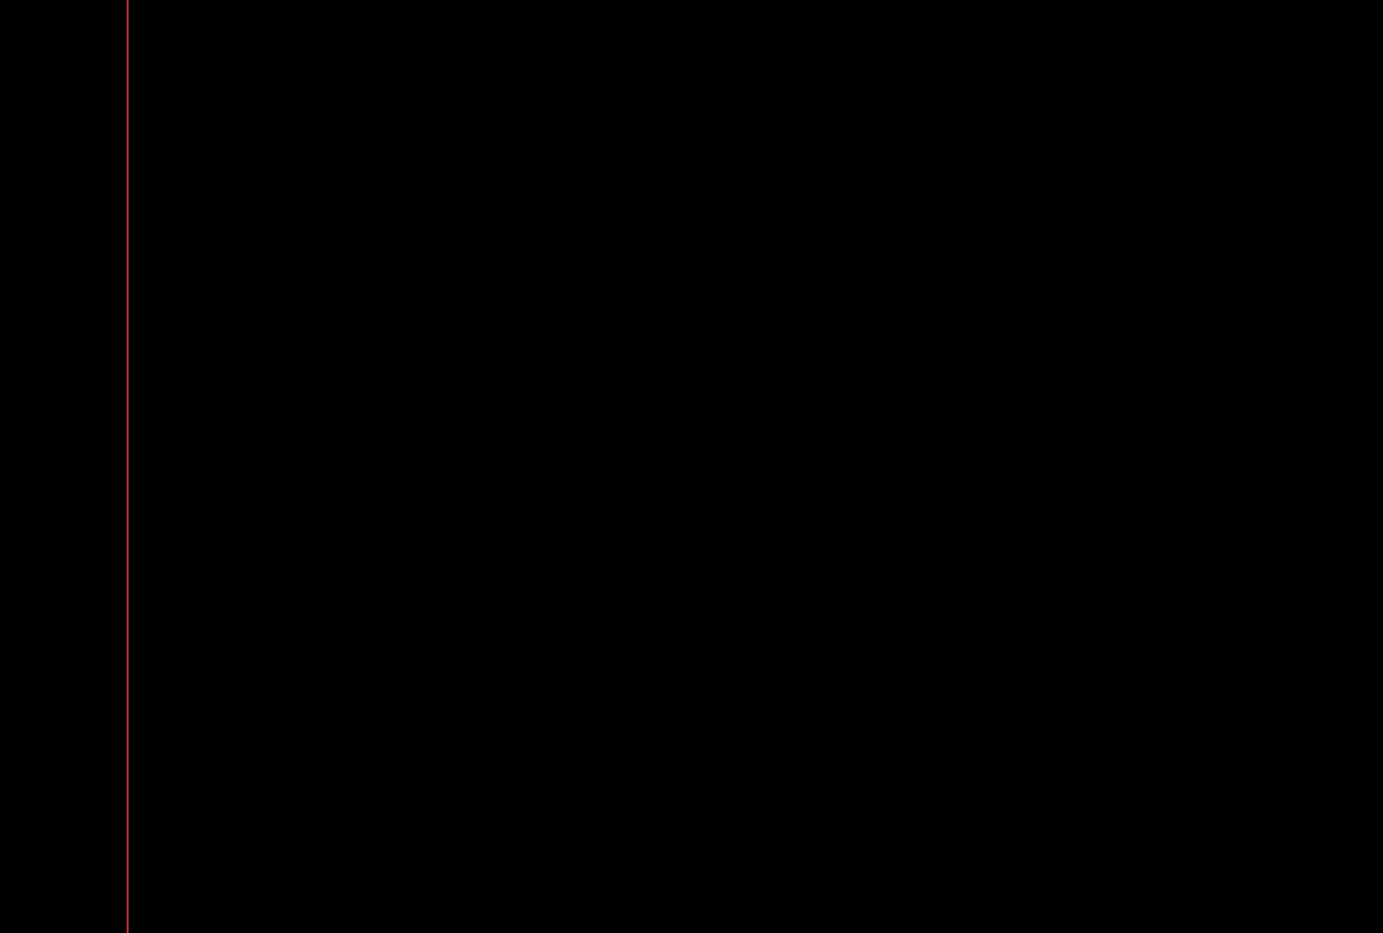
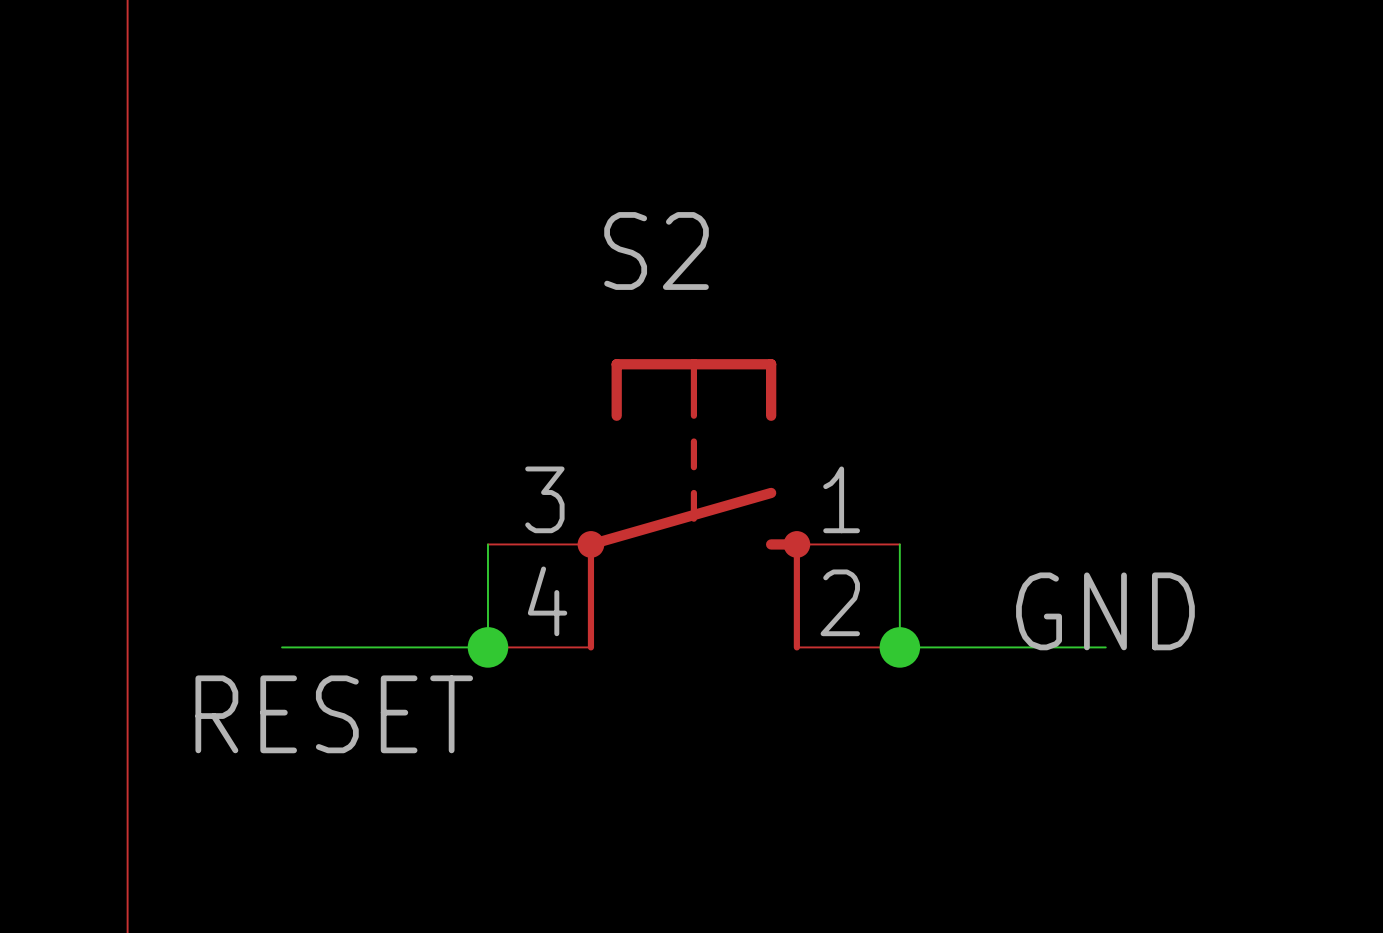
S2: none -> (693, 504)
wire: none -> (487, 544) (487, 647) (282, 647)
wire: none -> (899, 544) (899, 647) (1105, 647)
label: none -> GND (1105, 611)
junction: none -> (487, 647)
junction: none -> (899, 647)
label: none -> RESET (334, 714)

